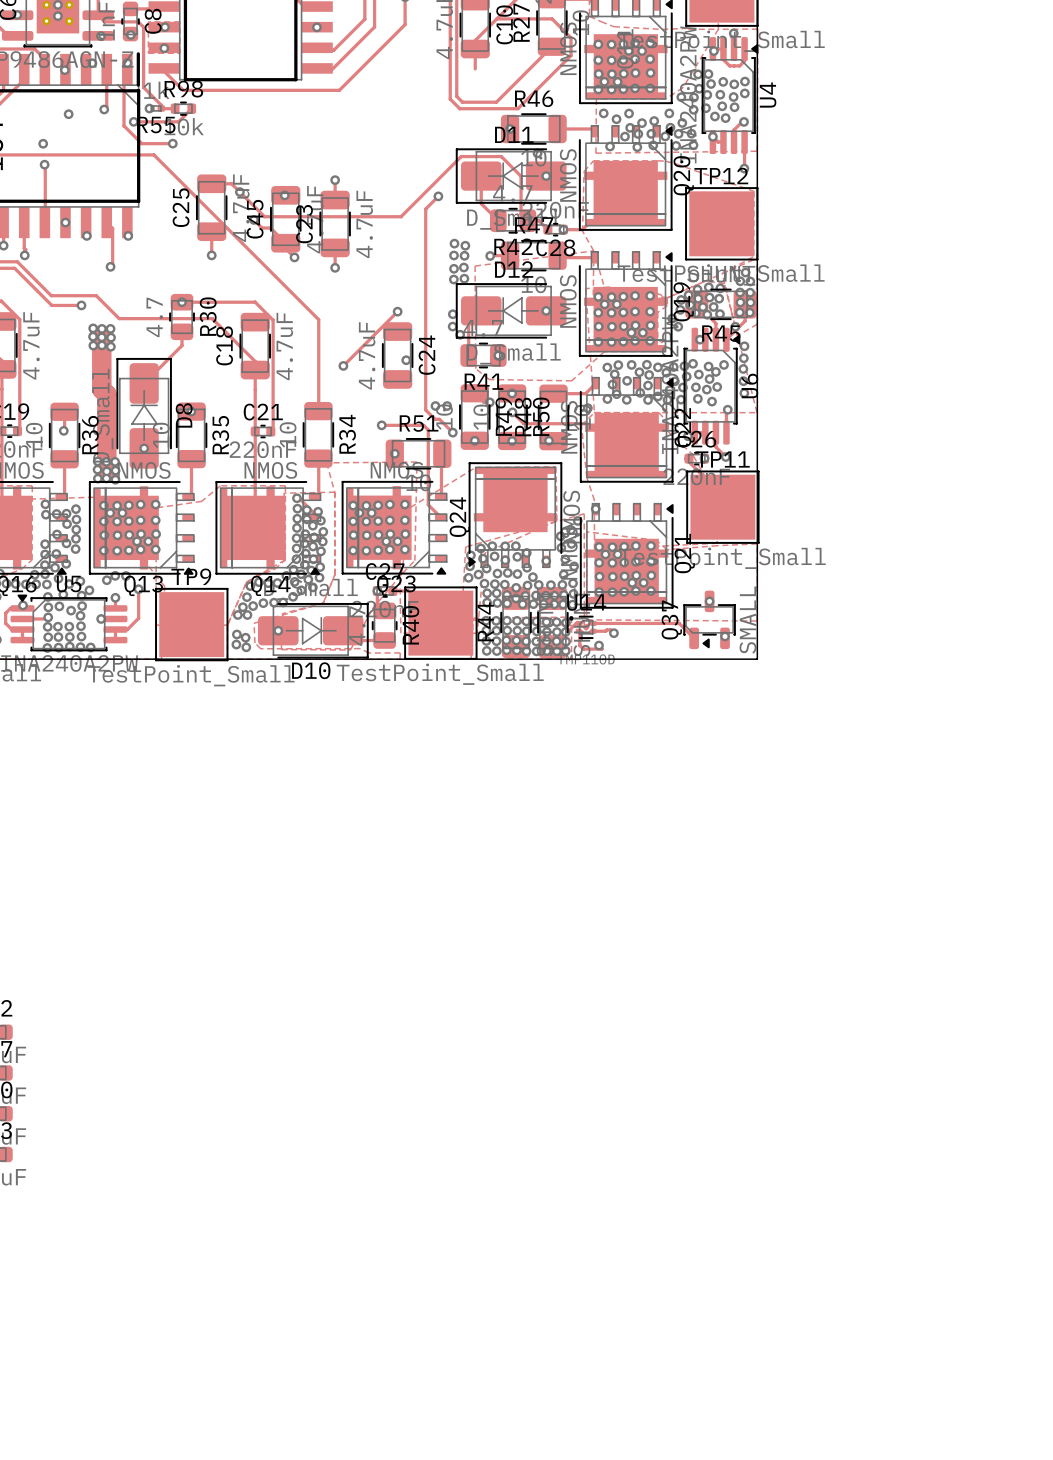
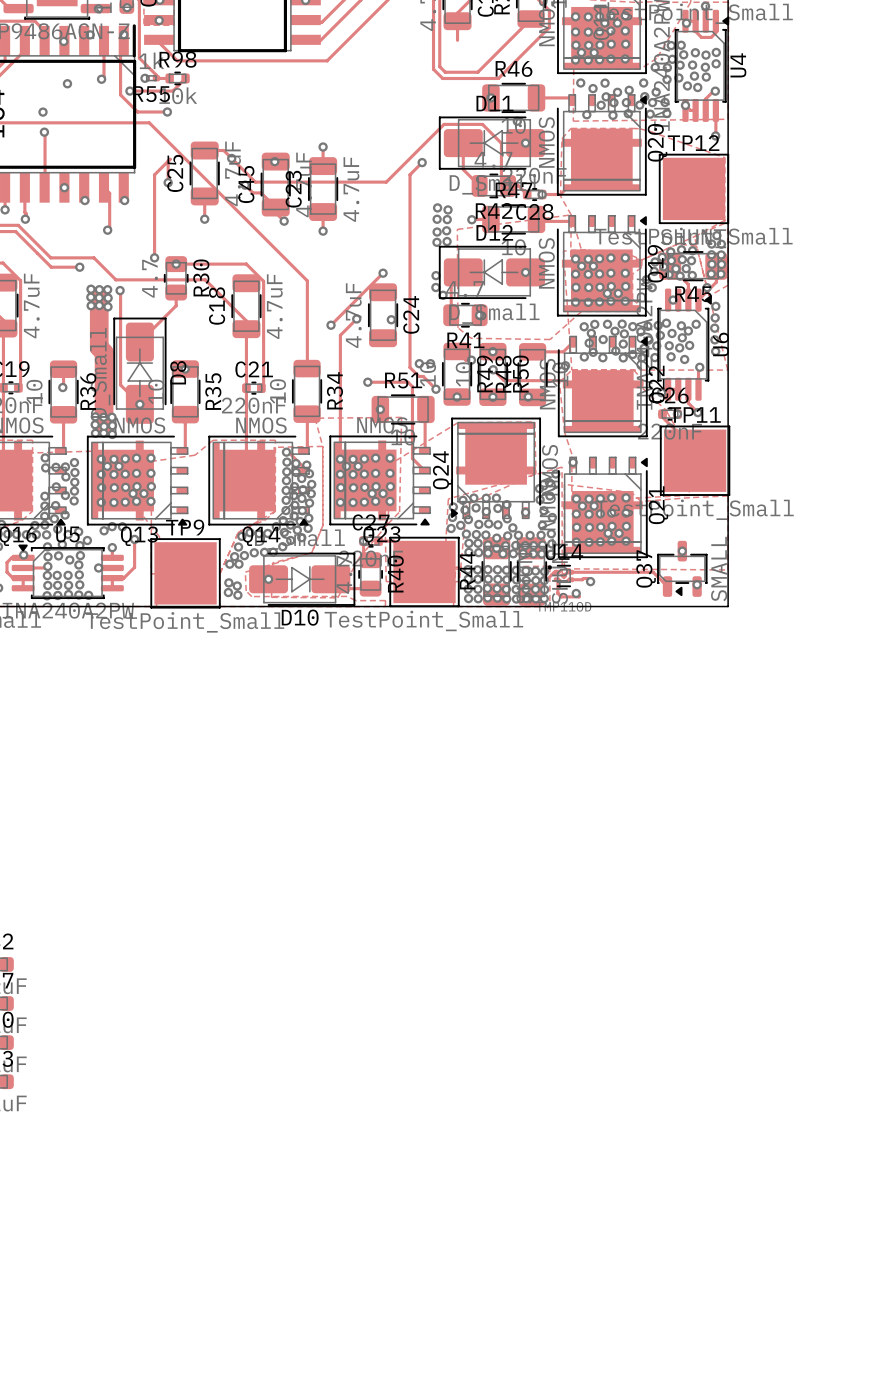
track: none -> (170, 159) (154, 174) (154, 257)
track: none -> (168, 161) (168, 182)
via: none -> (168, 182)
via: none -> (154, 257)
via: none -> (120, 290)
track: none -> (120, 290) (120, 385) (139, 404)
track: none -> (356, 318) (340, 335) (340, 459)
via: none -> (356, 318)

